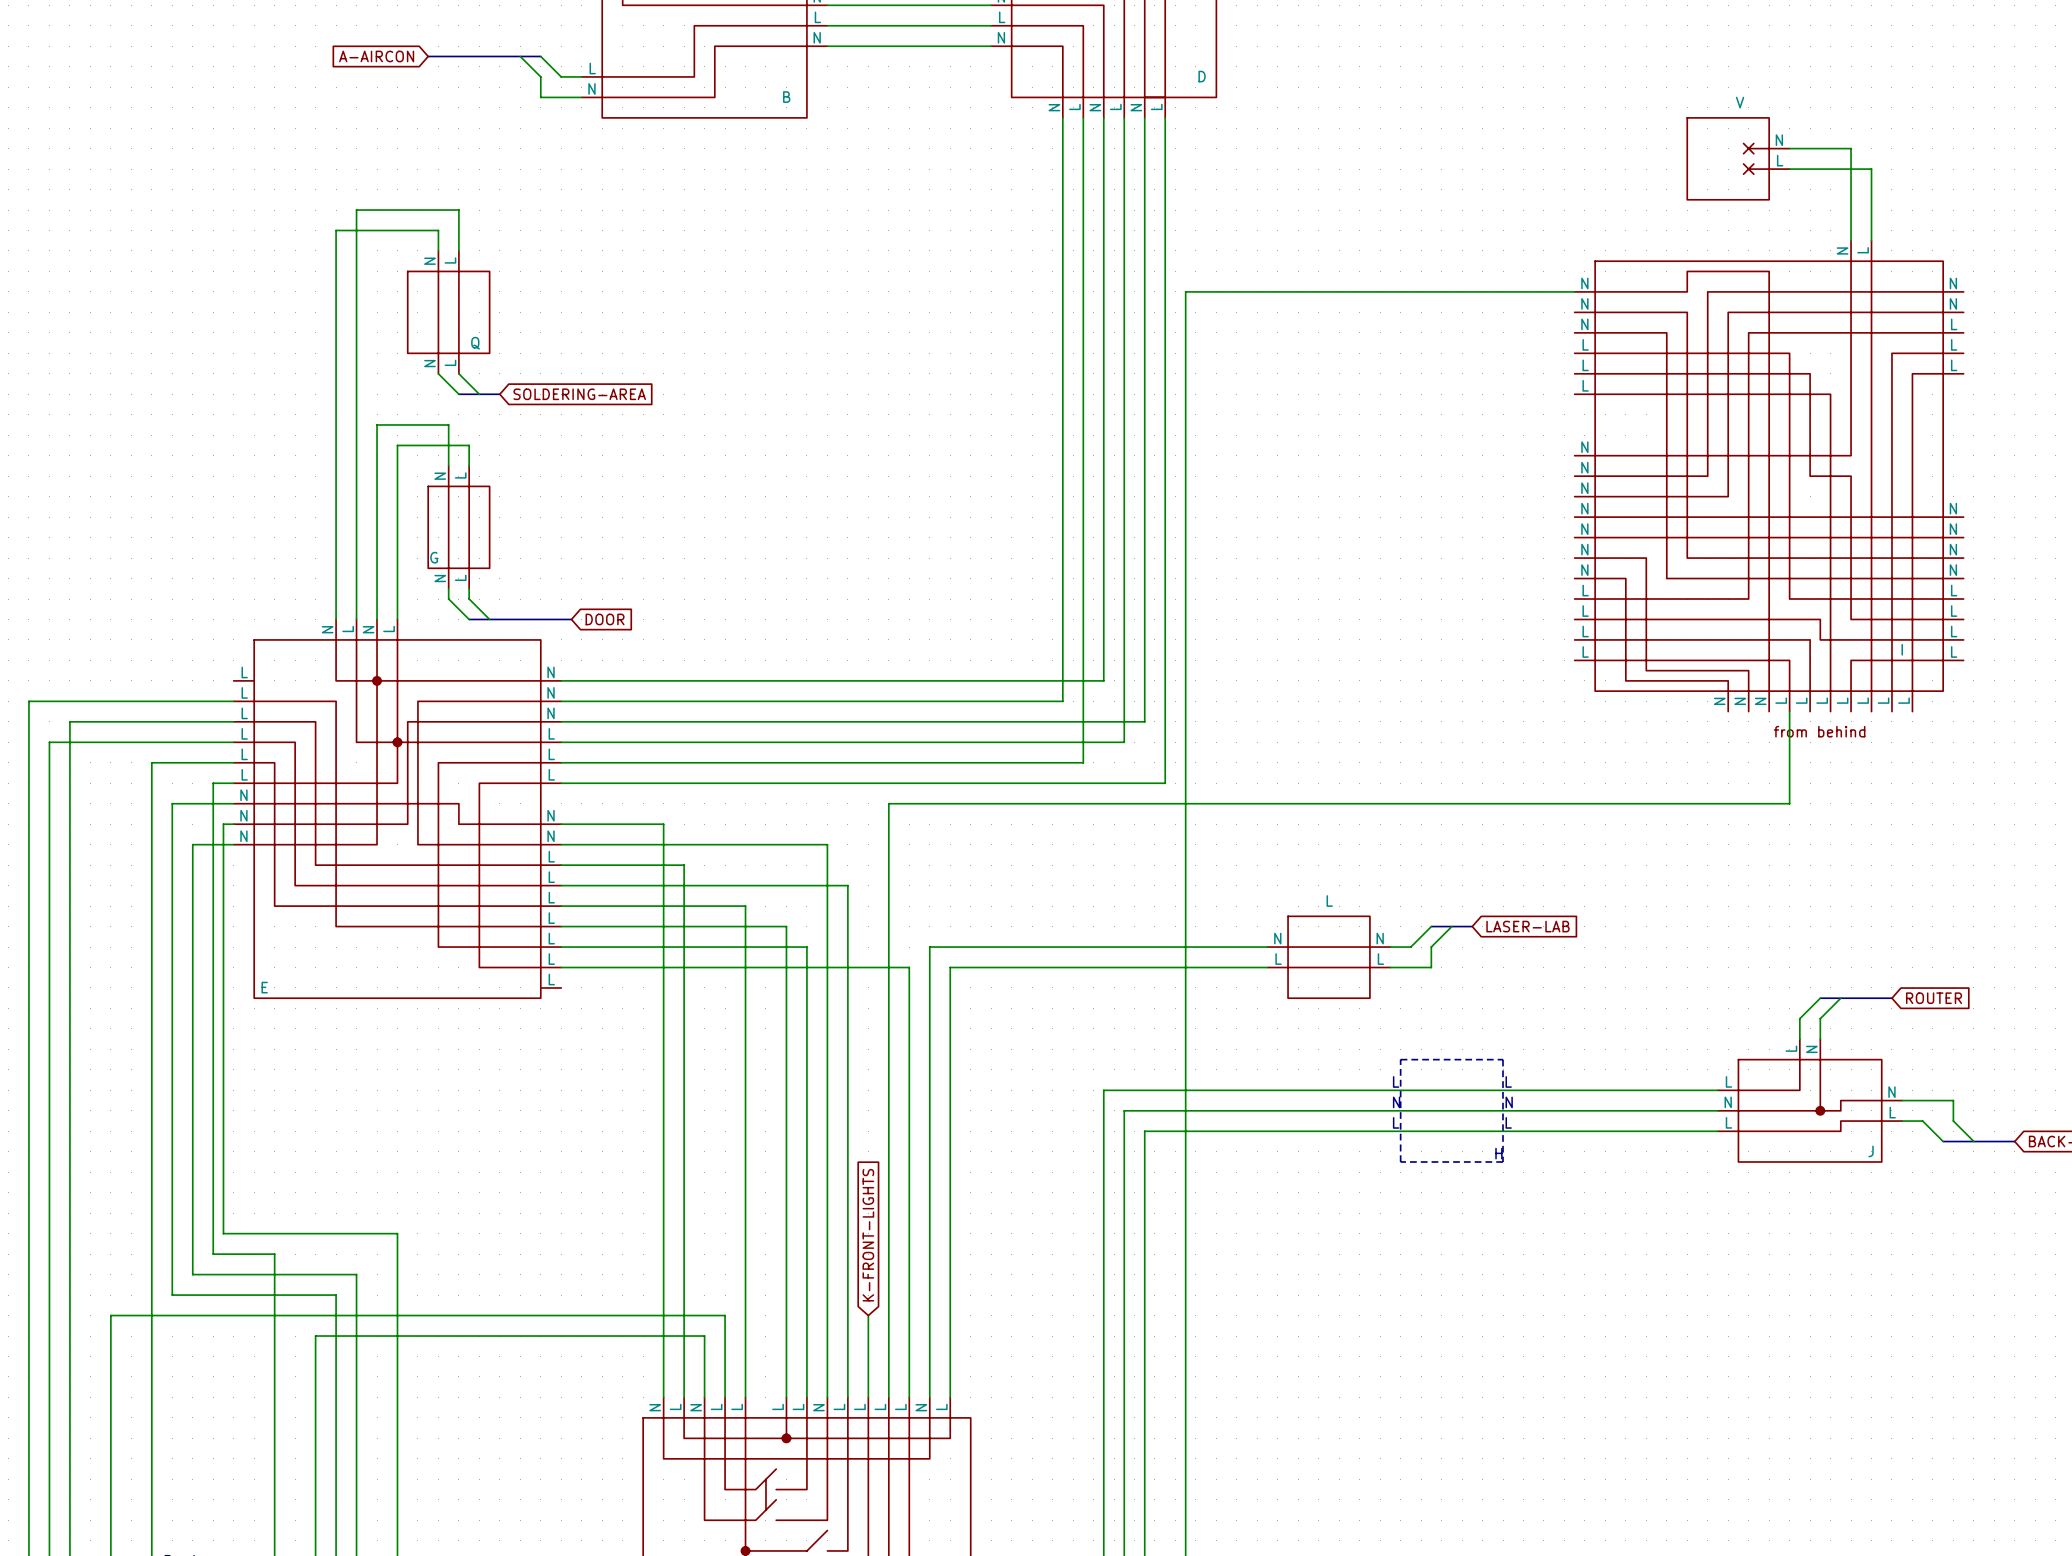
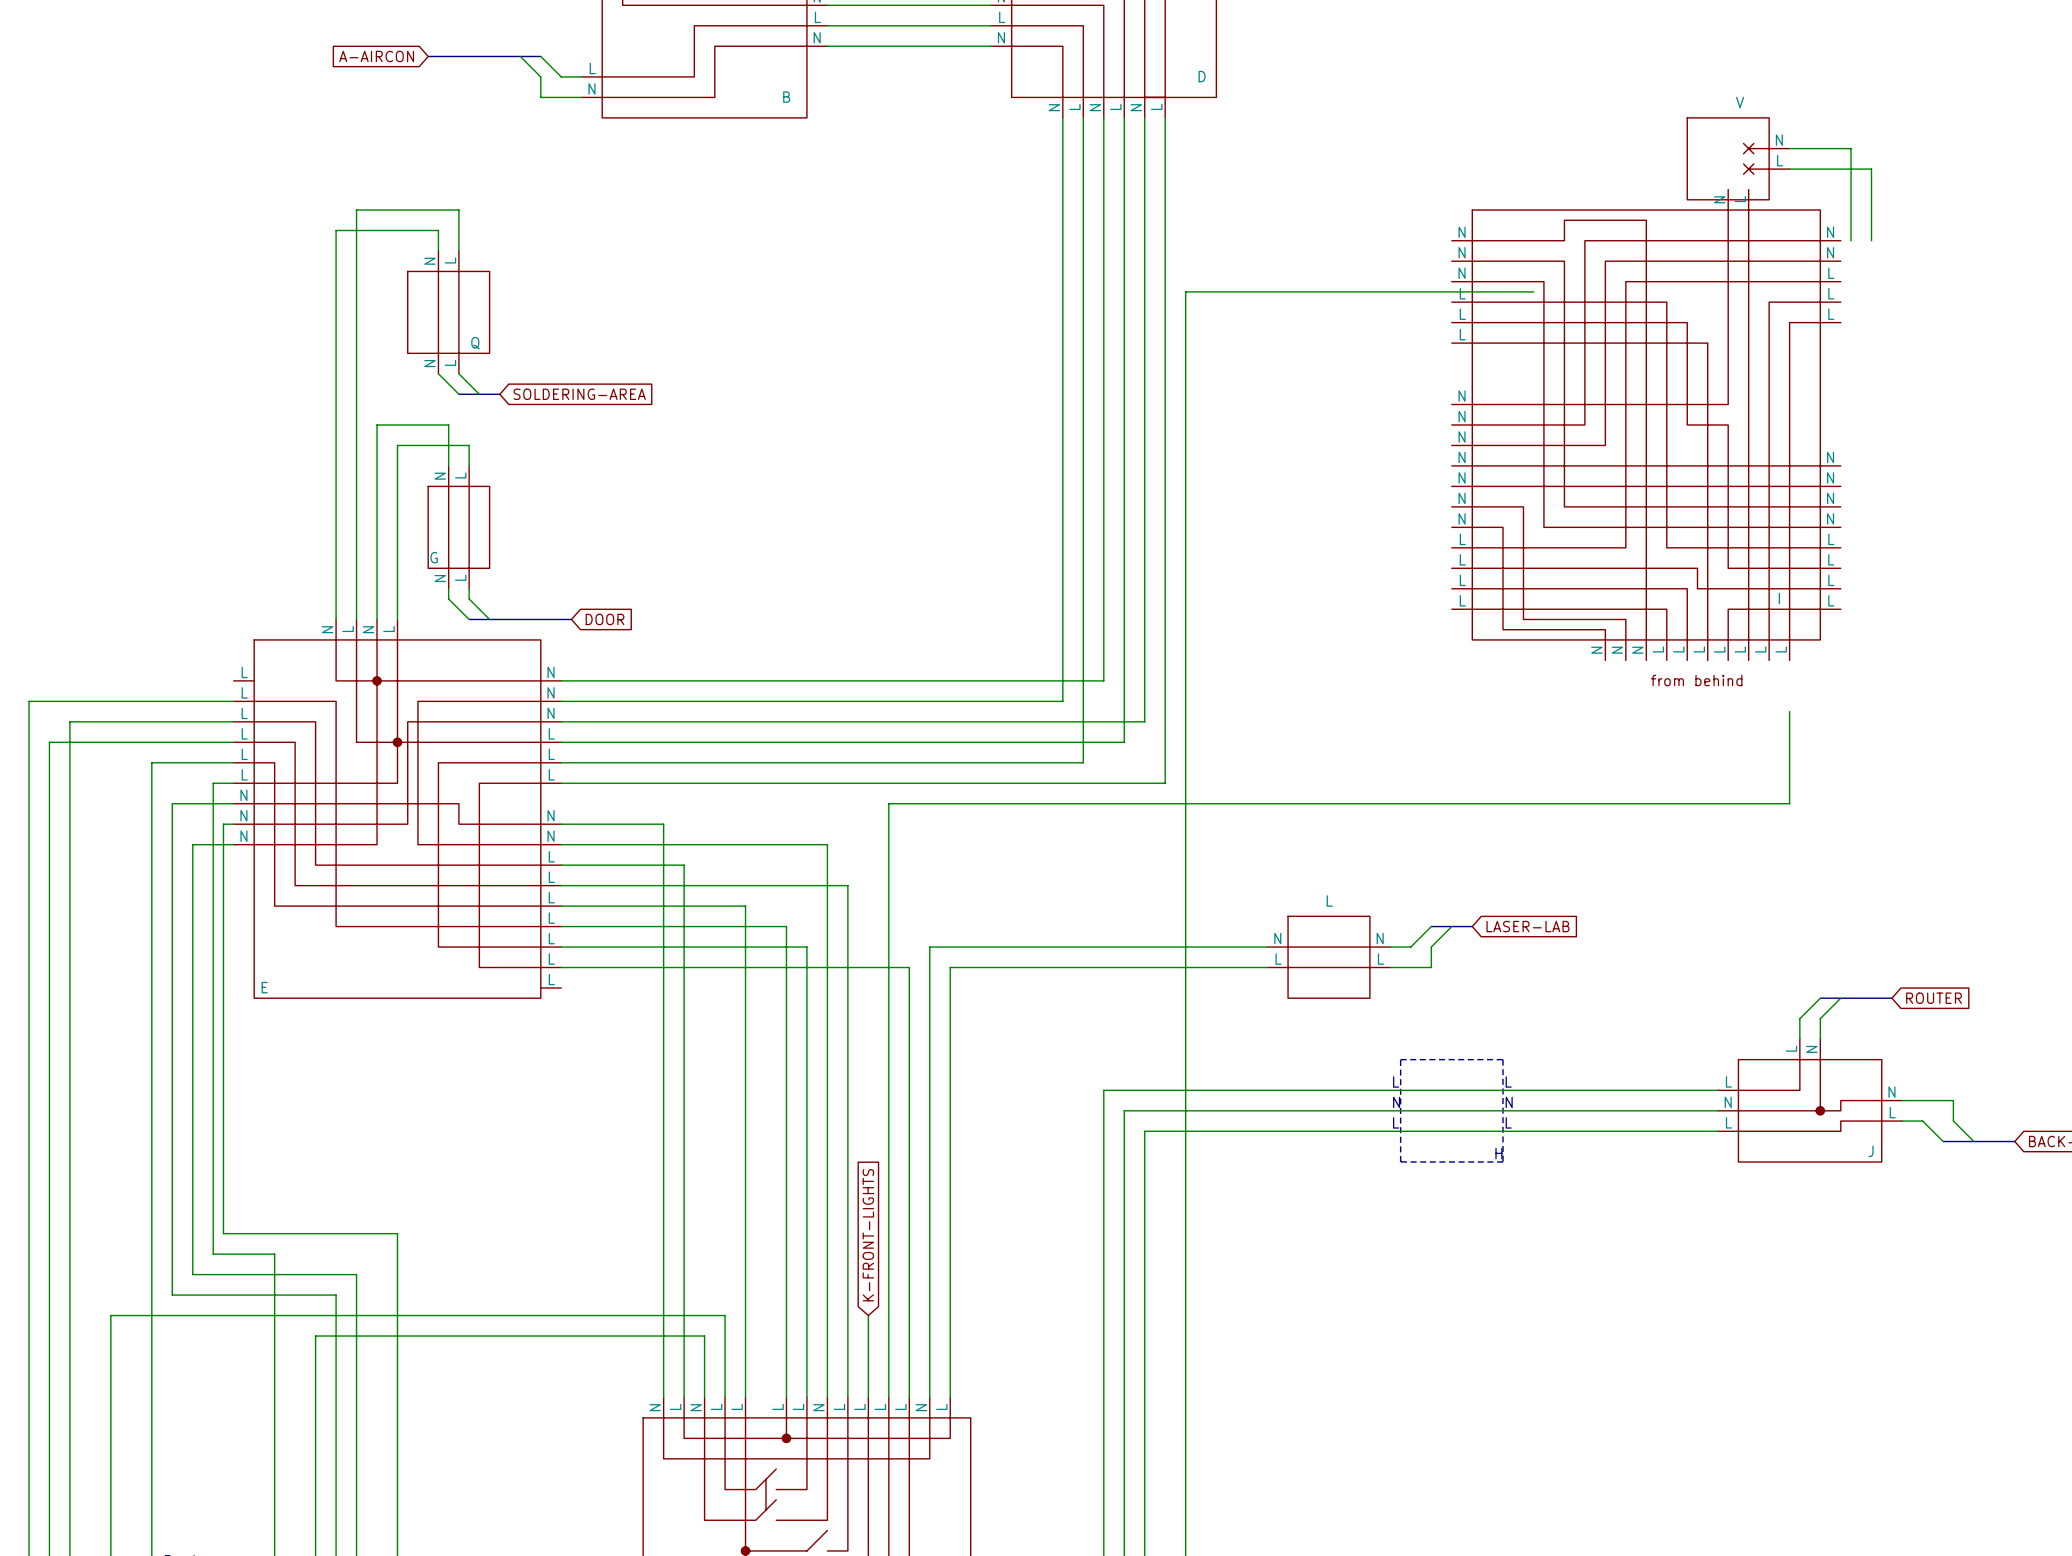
wire: (1533, 291) (1574, 291) -> none
part position: (1769, 476) -> (1646, 424)

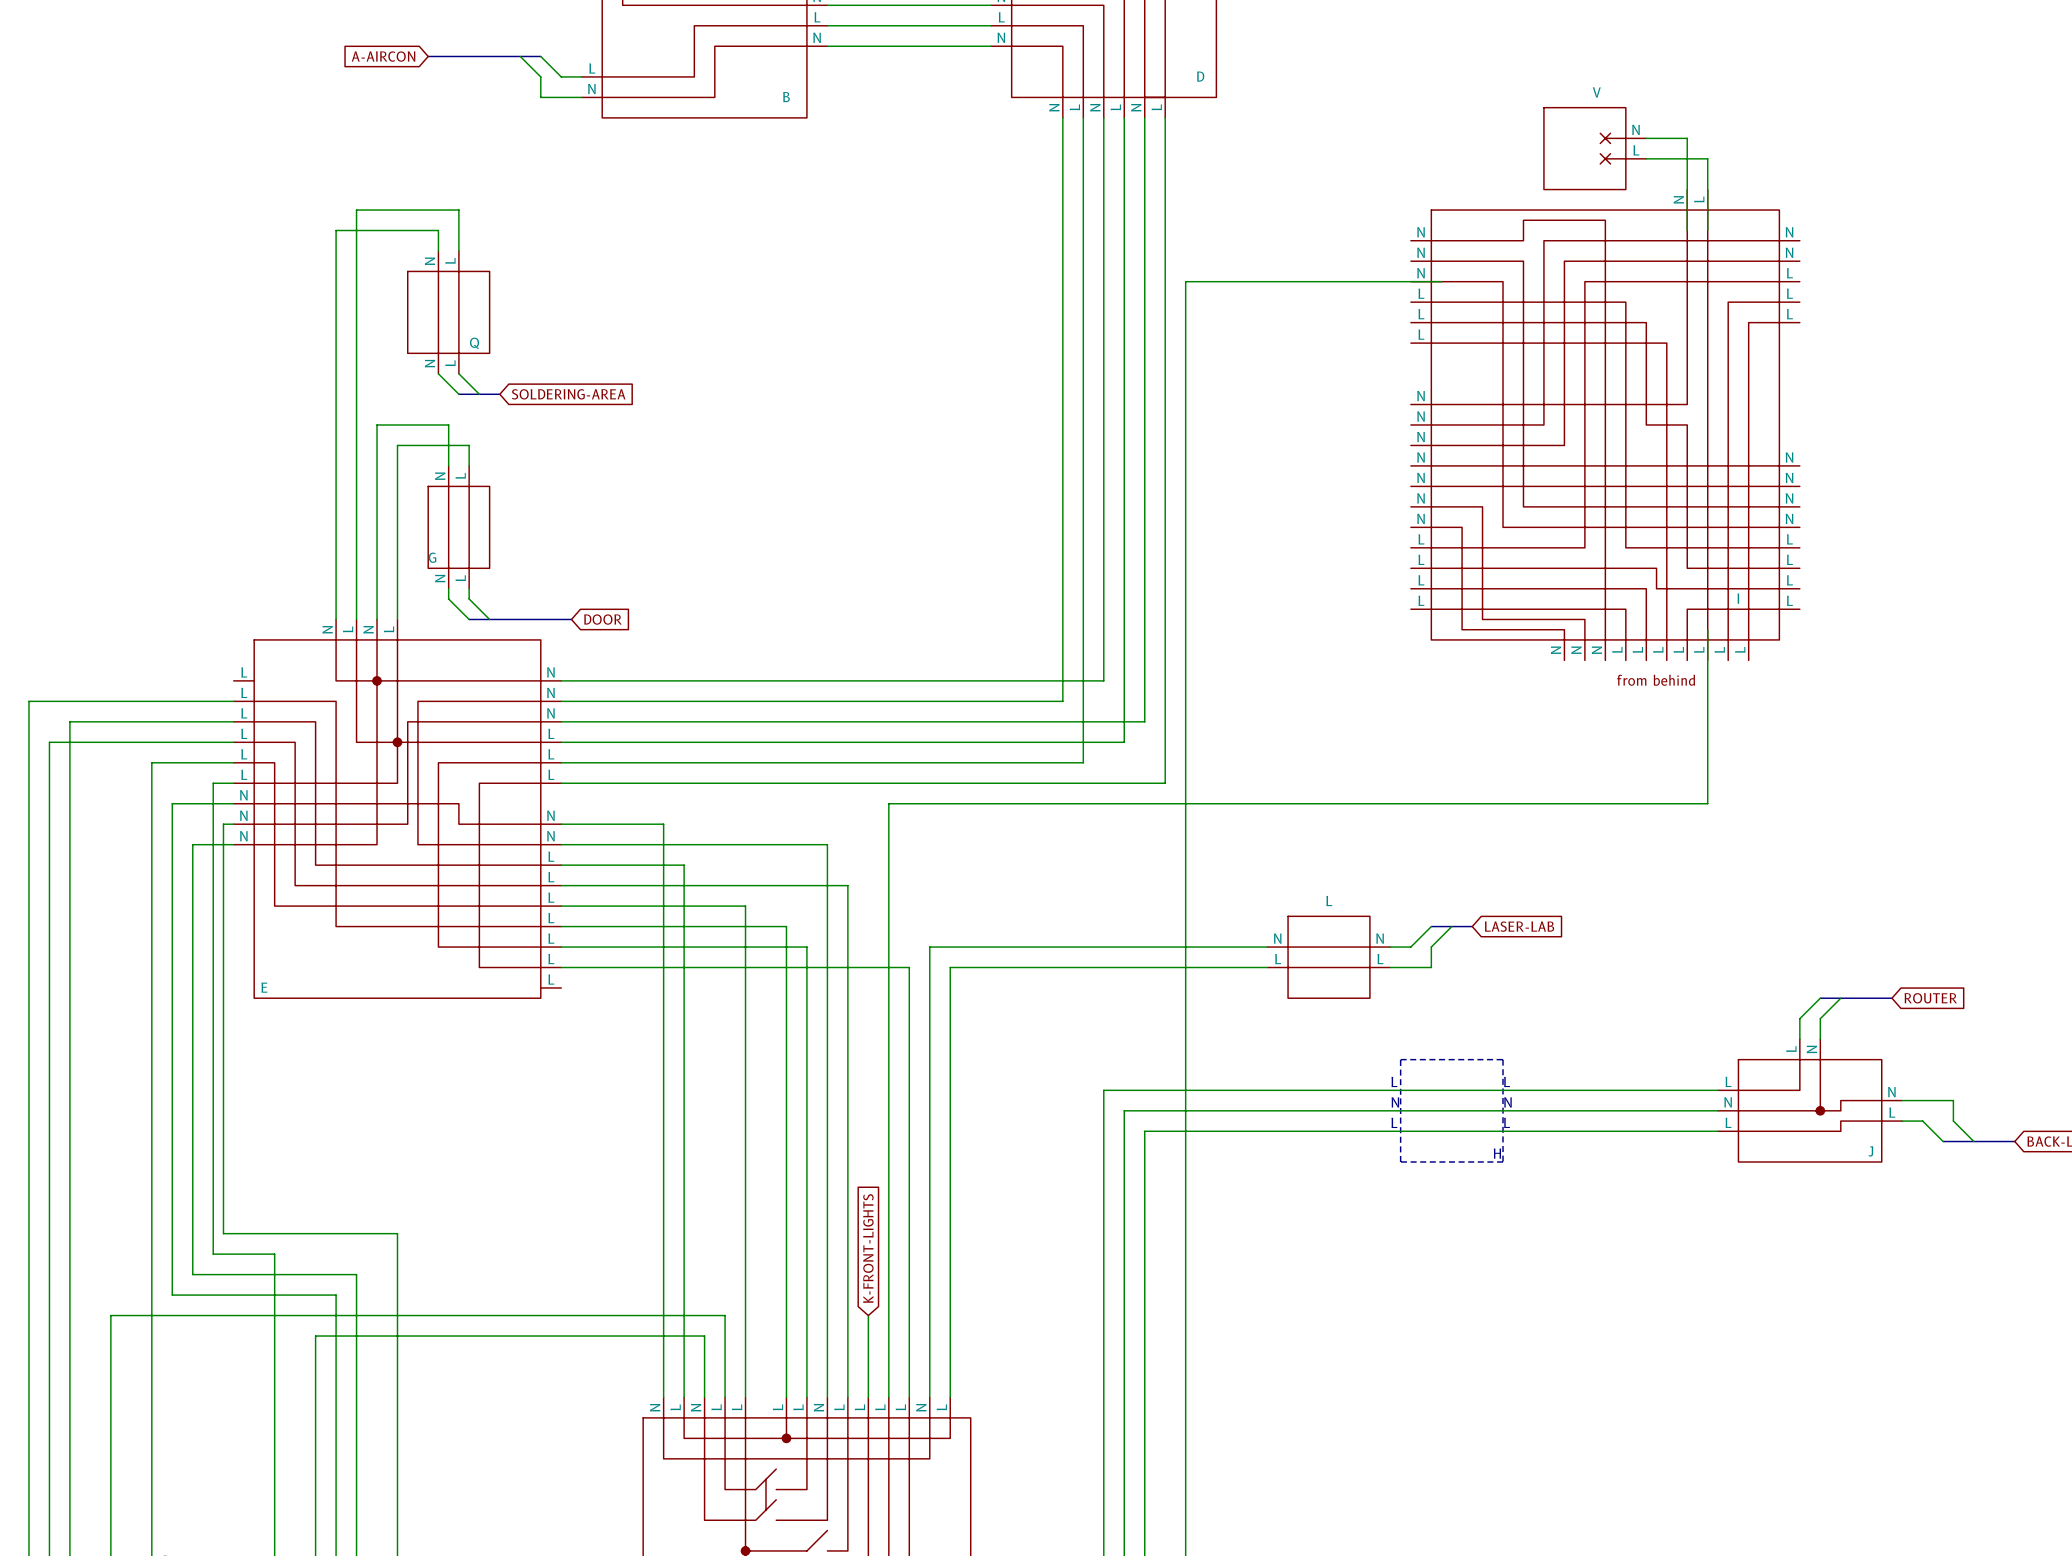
wire: none -> (1646, 138) (1687, 138) (1687, 230)
wire: (1789, 148) (1851, 148) (1851, 240) -> none
wire: none -> (1646, 158) (1707, 158) (1707, 230)
part position: (1738, 158) -> (1595, 148)
wire: (1789, 169) (1871, 169) (1871, 240) -> none
wire: (1185, 291) (1533, 291) -> (1185, 291) (1185, 281) (1441, 281)
part position: (1646, 424) -> (1605, 424)
wire: (1789, 711) (1789, 803) (1707, 803) -> (1707, 629) (1707, 803)

